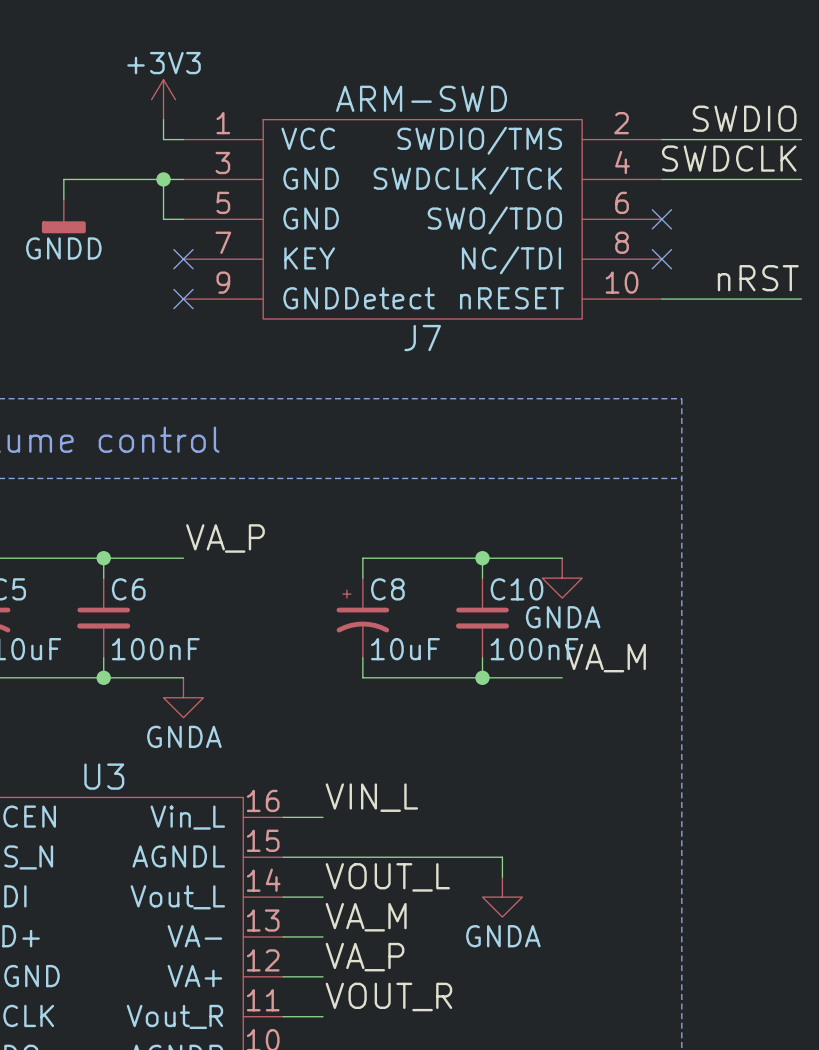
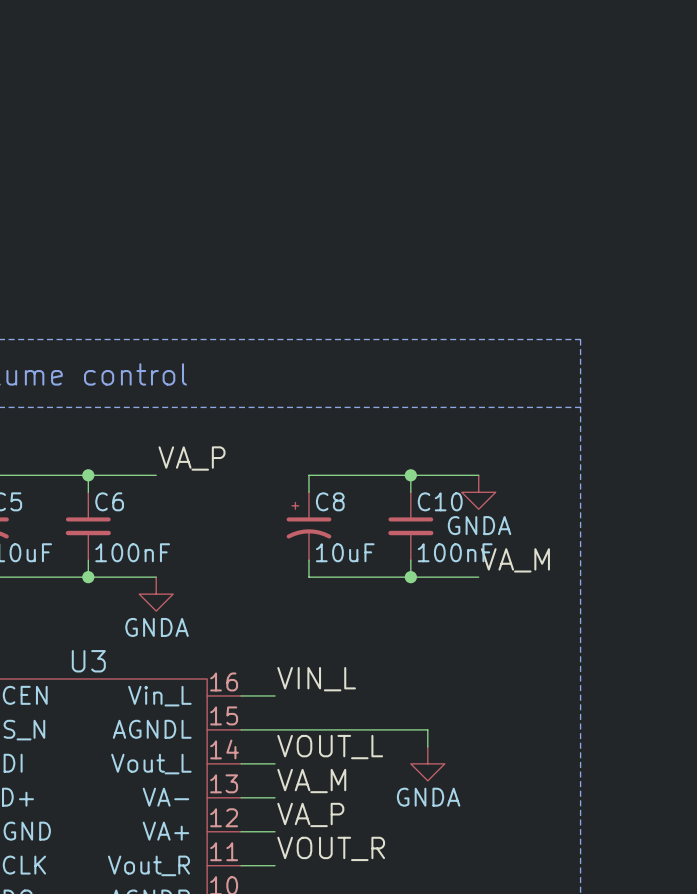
power symbol: +3V3 (163, 99) -> none
label: SWDIO (744, 118) -> none
wire: (163, 119) (163, 139) (183, 139) -> none
wire: (661, 139) (801, 139) -> none
label: SWDCLK (729, 158) -> none
wire: (163, 179) (163, 219) (183, 219) -> none
junction: (163, 179) -> none
wire: (183, 179) (63, 179) (63, 199) -> none
wire: (661, 179) (801, 179) -> none
power symbol: GNDD (63, 216) -> none
J7: ARM-SWD (422, 219) -> none
no-connect mark: (661, 219) -> none
no-connect mark: (183, 259) -> none
no-connect mark: (661, 259) -> none
label: nRST (758, 278) -> none
no-connect mark: (183, 299) -> none
wire: (661, 299) (801, 299) -> none

